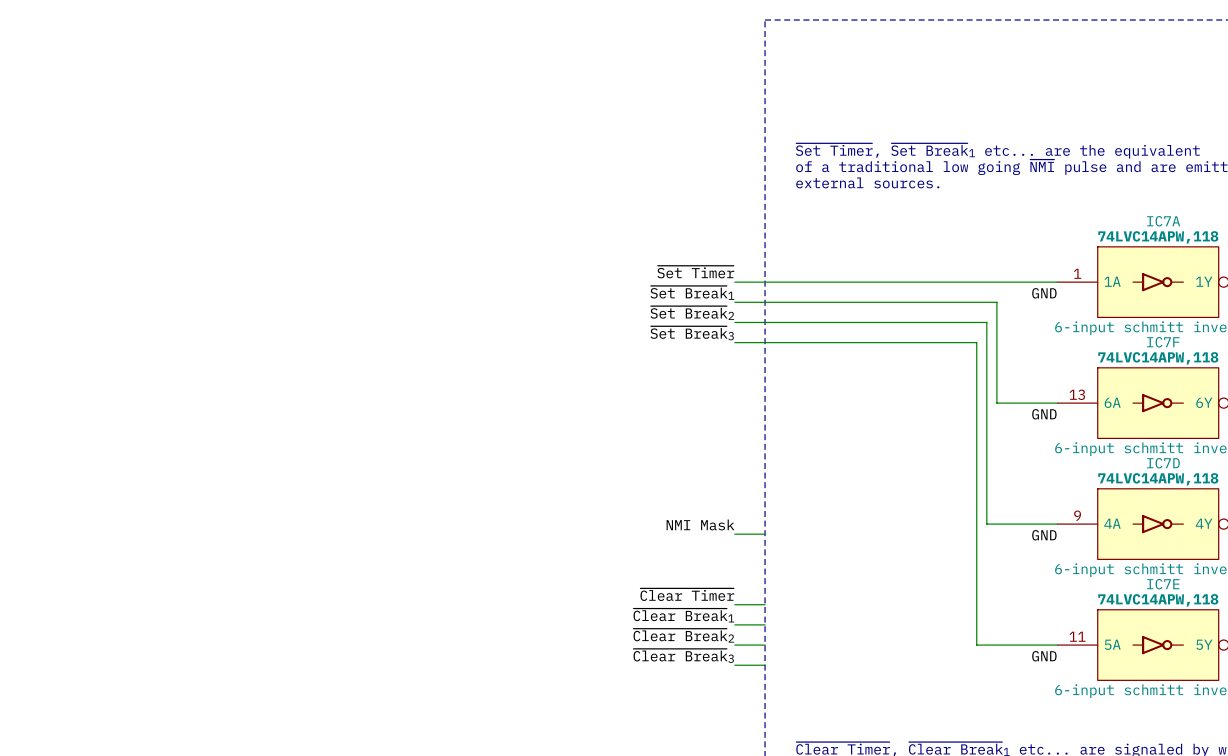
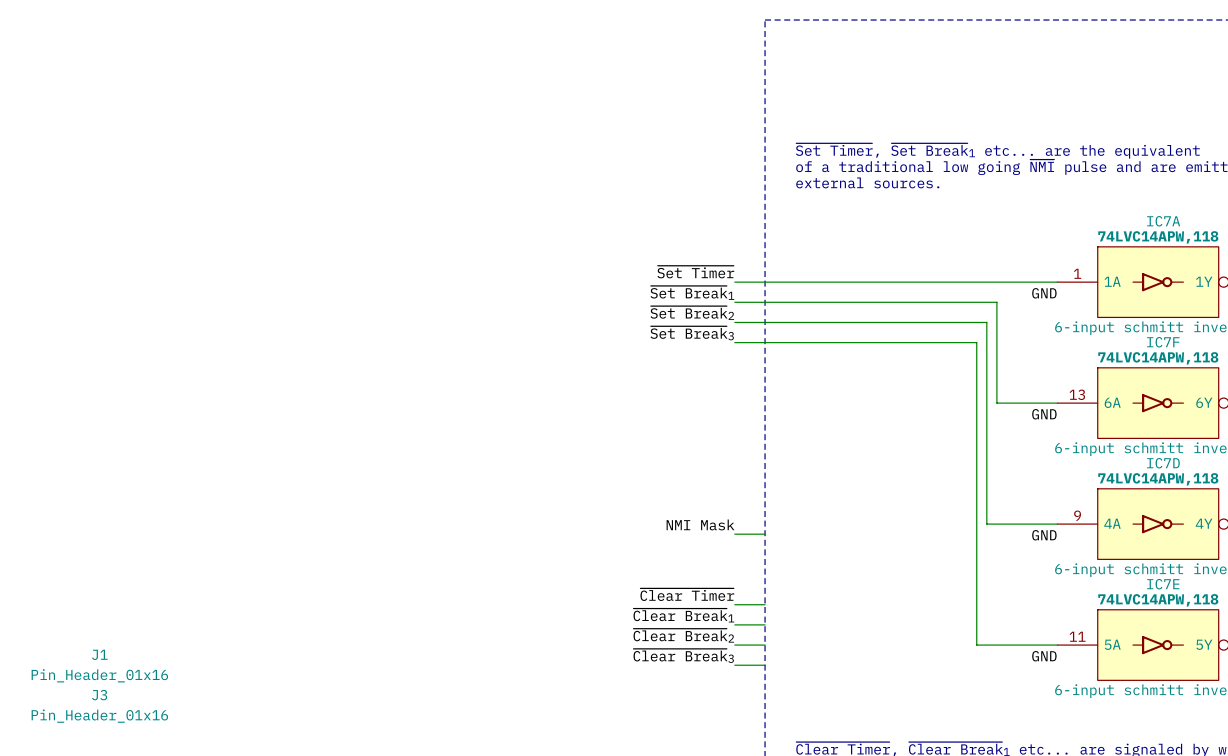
J1: none -> Pin_Header_01x16 (99, 666)
J3: none -> Pin_Header_01x16 (99, 706)

